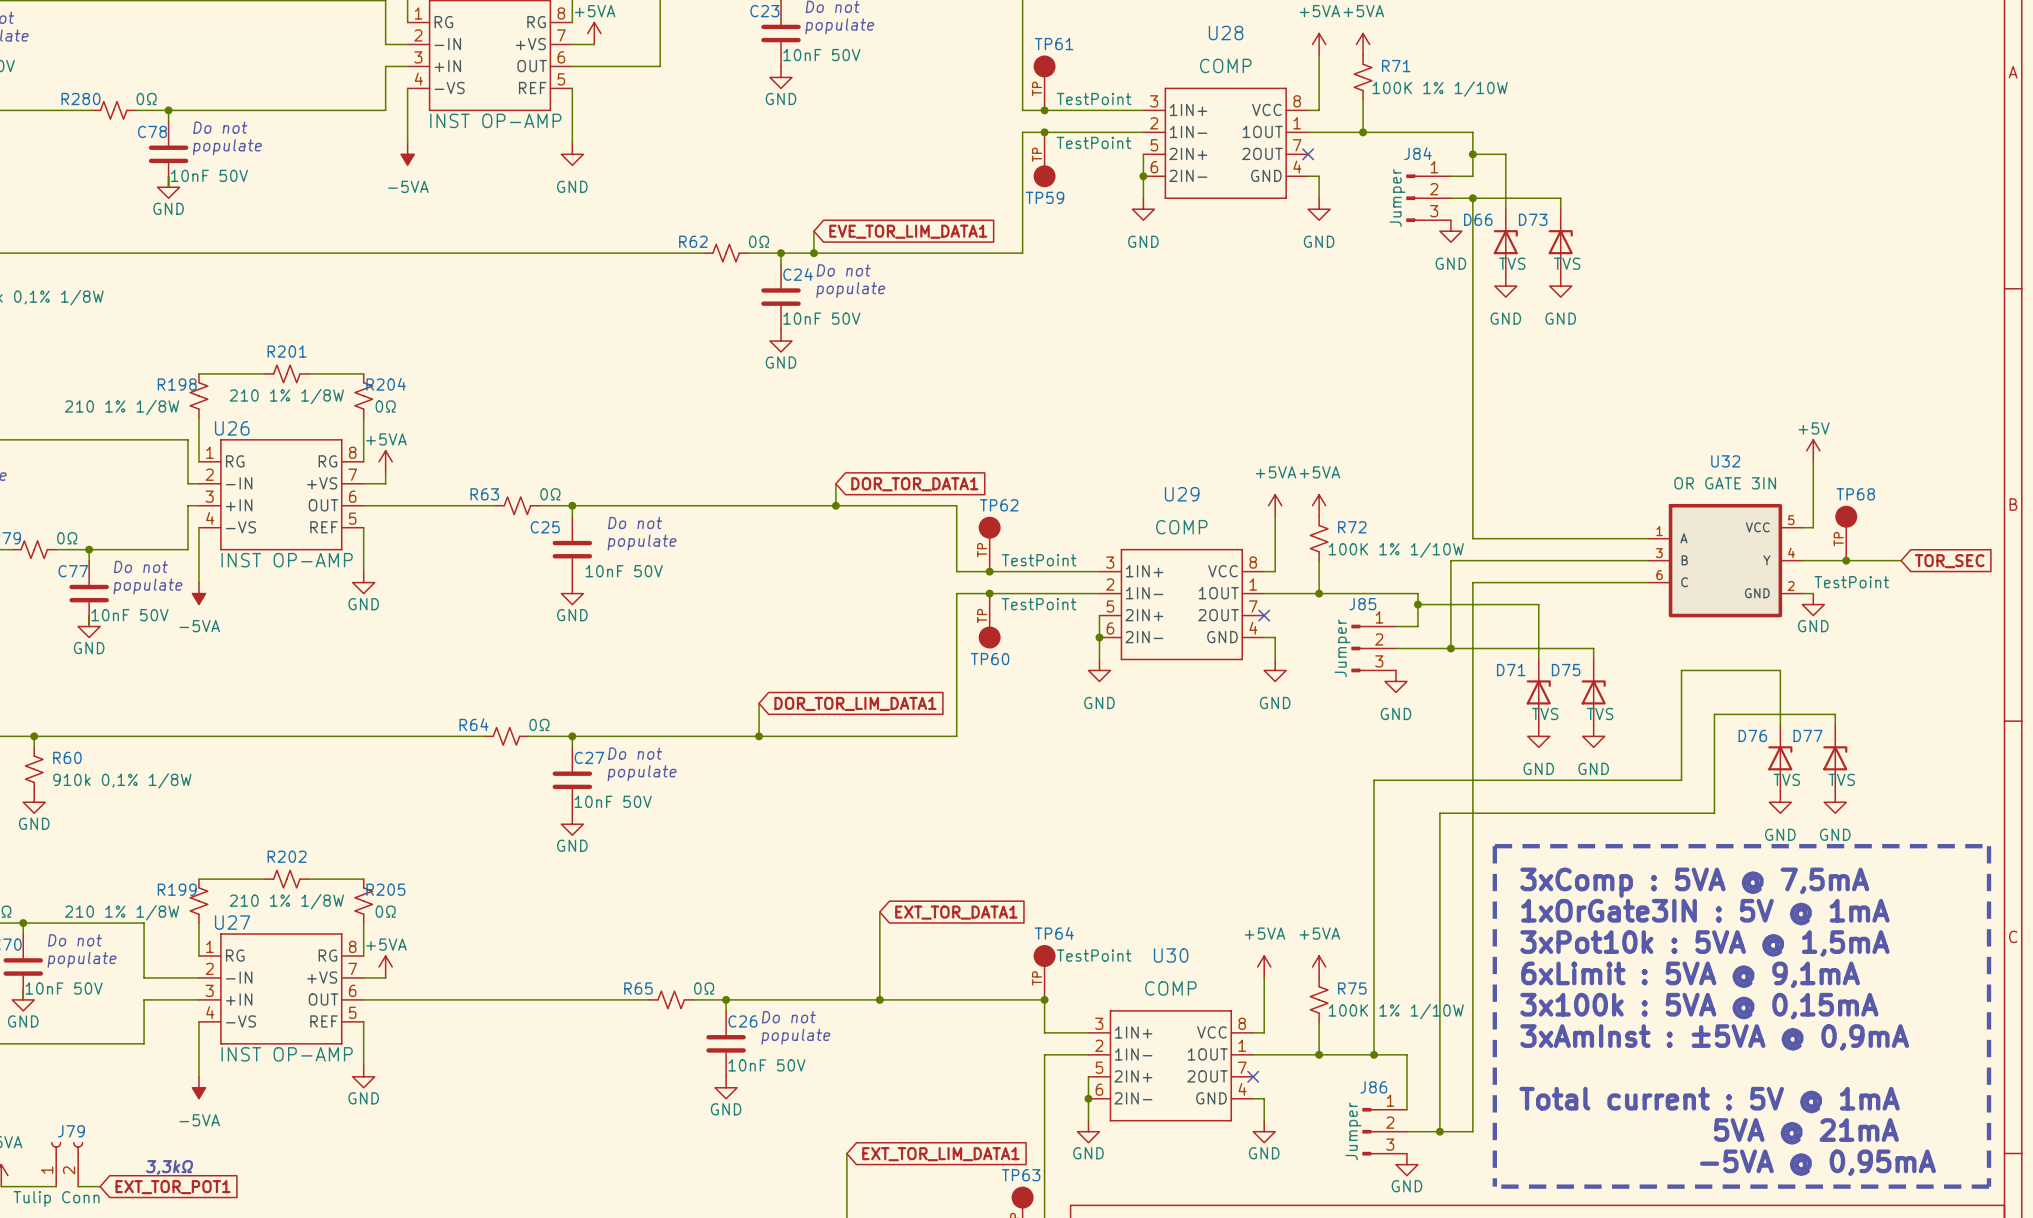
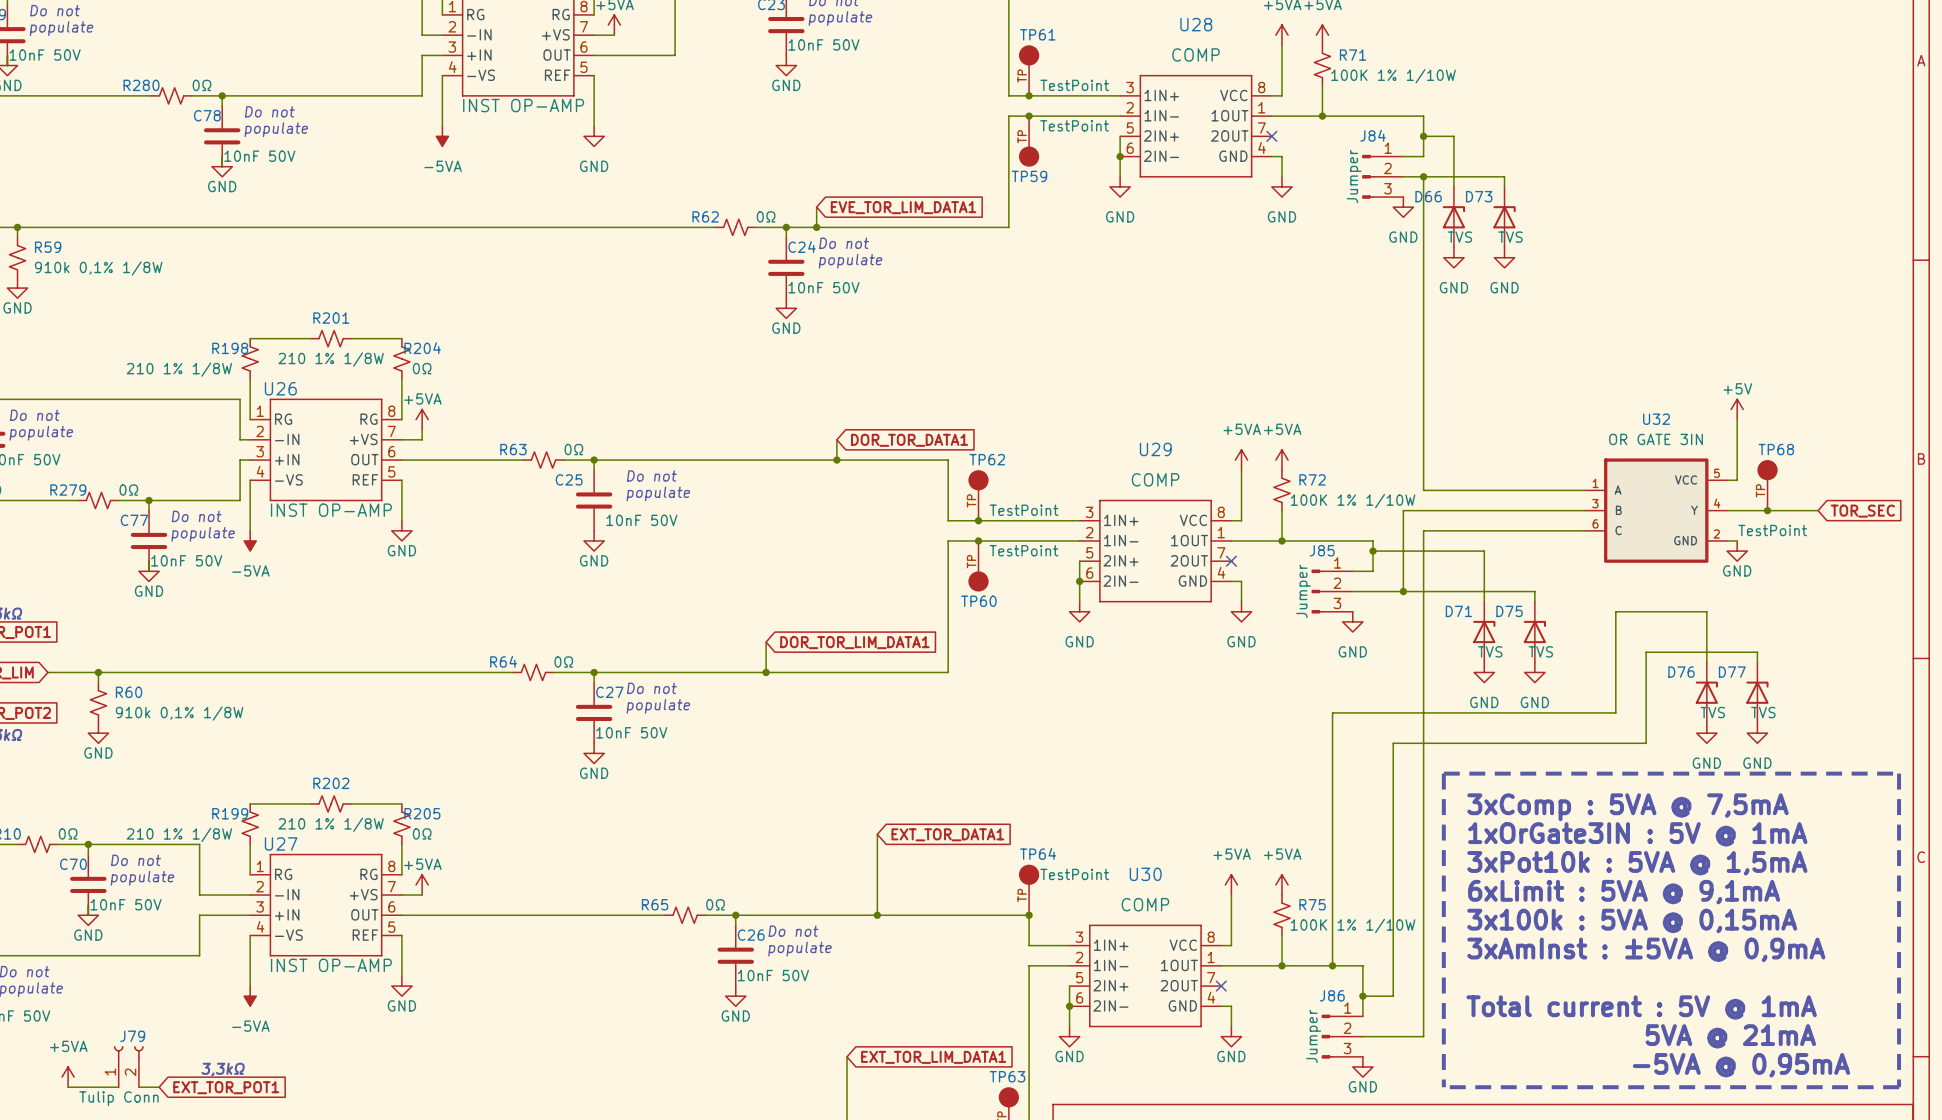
junction: none -> (1362, 996)
wire: (1439, 1087) (1439, 1131) -> (1393, 996) (1362, 996)
junction: (1439, 1131) -> none

